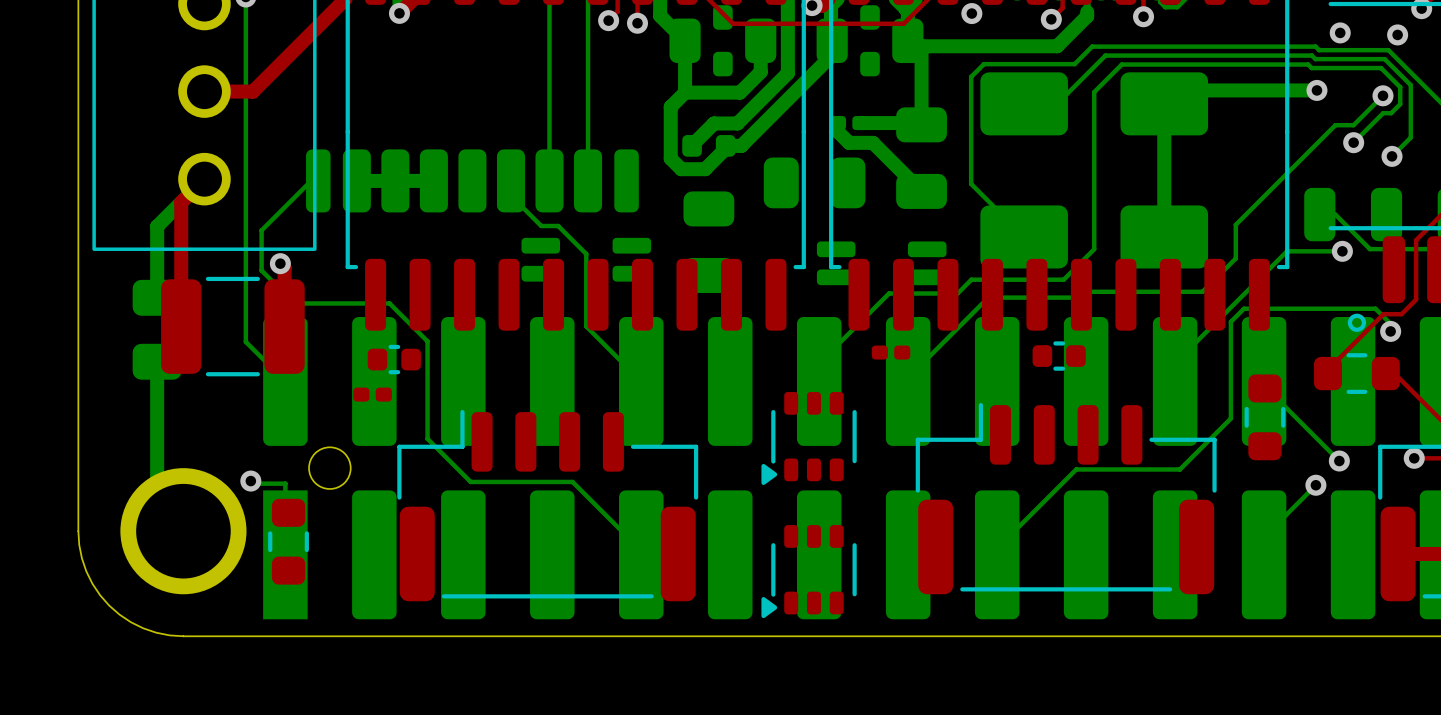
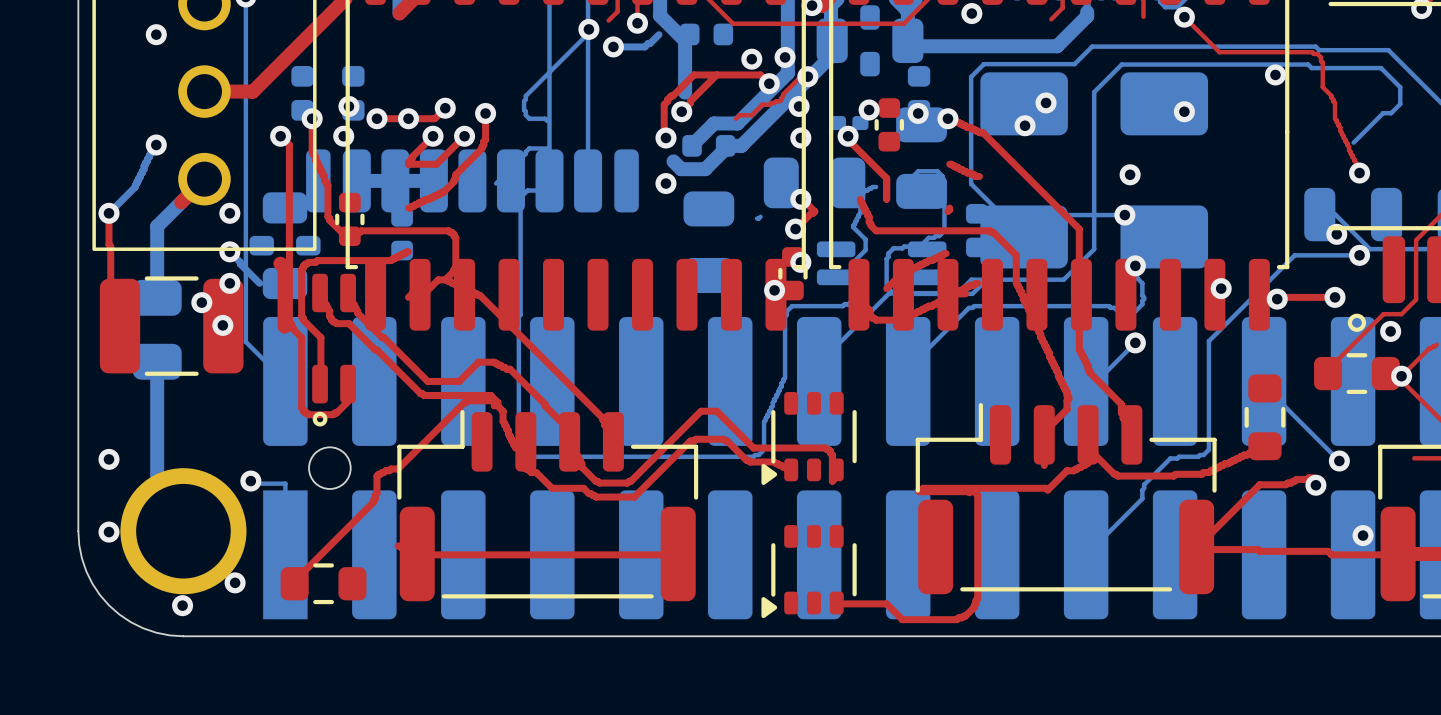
part footprint: [669, 5, 777, 77] -> [679, 23, 734, 46]
via: (399, 13) -> none
via position: (1143, 16) -> (1184, 17)
top track: none -> (1184, 17) (1219, 52) (1312, 52) (1317, 53) (1322, 62) (1322, 87) (1331, 95) (1335, 102) (1335, 118) (1359, 173)
via: (1051, 19) -> none
via position: (608, 20) -> (588, 29)
bottom track: none -> (588, 29) (588, 32) (525, 95) (524, 101) (525, 115) (529, 118) (548, 120)
via: (1340, 32) -> none
via: none -> (156, 34)
bottom track: none -> (658, 34) (644, 46) (613, 46)
via: (1397, 34) -> none
bottom track: (760, 40) (760, 72) (740, 92) (685, 92) (670, 106) (670, 158) (673, 161) -> none
via: none -> (613, 46)
bottom track: (921, 46) (921, 124) (919, 123) (860, 123) -> none
via: none -> (785, 57)
via: none -> (751, 59)
top track: none -> (716, 74) (681, 111)
via: none -> (1275, 74)
top track: none -> (807, 76) (800, 76) (783, 94) (779, 101) (762, 104) (751, 115) (739, 115) (736, 118)
via: none -> (807, 76)
top track: none -> (769, 83) (760, 74) (693, 74) (664, 104) (664, 136) (665, 138)
via: none -> (769, 83)
bottom track: (1177, 90) (1316, 90) -> none
via: (1316, 90) -> none
part: none -> (302, 93)
part: none -> (353, 93)
part: none -> (919, 93)
bottom track: (1382, 95) (1353, 125) (1335, 125) (1235, 224) (1235, 258) (1202, 291) (1087, 291) (1081, 297) (988, 297) (911, 374) -> (1135, 265) (1137, 278) (1142, 283) (1142, 295) (1144, 297) (1142, 304) (1135, 311) (1121, 314) (1114, 307) (1109, 306) (974, 306) (968, 307) (916, 360) (911, 374)
via: (1382, 95) -> none
via: none -> (1046, 102)
bottom track: (1024, 103) (1057, 103) (1105, 55) (1311, 55) (1315, 59) (1384, 59) (1410, 85) (1410, 137) (1392, 156) -> none
bottom track: (1164, 103) (1164, 236) -> none
via: none -> (348, 106)
via: none -> (799, 106)
top track: none -> (445, 108) (434, 118) (376, 118)
via: none -> (445, 108)
via: none -> (869, 109)
via: none -> (681, 111)
via: none -> (1184, 111)
top track: none -> (485, 113) (485, 139) (482, 148) (455, 174) (454, 181) (443, 192) (408, 208)
via: none -> (485, 113)
via: none -> (918, 113)
top track: none -> (312, 118) (312, 152) (327, 185) (327, 216) (329, 220) (341, 232) (348, 236) (361, 230) (448, 230) (452, 232) (455, 237) (455, 267) (445, 279)
via: none -> (312, 118)
via: none -> (376, 118)
via: none -> (408, 118)
top track: none -> (947, 118) (982, 132) (1079, 229) (1079, 349) (1089, 372) (1121, 404) (1123, 418) (1131, 435)
via: none -> (947, 118)
bottom track: (837, 123) (837, 131) (849, 142) (872, 142) (921, 191) -> none
part: none -> (889, 124)
via: none -> (1025, 125)
top track: none -> (280, 136) (289, 145) (289, 321) (292, 328) (301, 337) (301, 407) (303, 411) (308, 414) (333, 414) (336, 412) (347, 402) (347, 383)
via: none -> (280, 136)
via: none -> (343, 136)
top track: none -> (433, 136) (412, 157) (408, 164) (436, 164) (464, 136)
via: none -> (433, 136)
via: none -> (464, 136)
top track: none -> (848, 136) (851, 139) (851, 143) (886, 178) (886, 199)
via: none -> (848, 136)
via: none -> (665, 138)
via: none -> (800, 138)
via: (1353, 142) -> none
bottom track: none -> (156, 145) (145, 162) (135, 187) (109, 213)
via: none -> (156, 145)
bottom track: none -> (548, 148) (529, 148) (496, 183)
via: (1392, 156) -> none
top track: none -> (949, 164) (979, 176)
via: none -> (1359, 173)
via: none -> (1130, 174)
bottom track: none -> (911, 178) (918, 171) (937, 171) (942, 176) (944, 181) (944, 230) (939, 236) (928, 237) (921, 244) (893, 248) (888, 253) (886, 286) (897, 293) (972, 293) (1051, 215) (1124, 215)
bottom track: (318, 180) (311, 180) (261, 230) (261, 270) (294, 303) (389, 303) (427, 341) (427, 438) (470, 481) (572, 481) (641, 550) (641, 554) -> none
bottom track: (510, 180) (510, 195) (541, 225) (558, 225) (586, 254) (586, 326) (641, 381) -> none
via: none -> (665, 183)
bottom track: none -> (876, 187) (869, 188) (862, 194) (860, 213) (853, 225) (865, 239) (865, 250) (853, 262) (853, 295) (851, 300) (842, 306) (792, 306) (786, 311) (785, 316) (785, 377) (764, 421) (762, 451) (753, 456) (529, 456) (520, 451) (518, 446) (520, 197) (527, 190) (548, 190)
top track: none -> (800, 199) (814, 211) (795, 229)
via: none -> (800, 199)
top track: none -> (860, 199) (869, 216) (869, 222) (876, 230) (989, 230) (1016, 255) (1016, 283) (1068, 397) (1067, 409) (1047, 430)
top track: (181, 202) (181, 326) -> none
top track: none -> (949, 208) (947, 211)
top track: none -> (109, 213) (110, 307) (119, 325)
via: none -> (109, 213)
via: none -> (229, 213)
via: none -> (1124, 215)
bottom track: none -> (760, 216) (757, 218)
via: none -> (795, 229)
part: none -> (976, 230)
part: none -> (402, 233)
via: none -> (1336, 234)
part: none -> (285, 245)
bottom track: none -> (229, 251) (259, 283)
via: none -> (229, 251)
top track: none -> (408, 251) (390, 260) (317, 260) (303, 265) (301, 269) (301, 316) (320, 337) (320, 383)
bottom track: (1342, 251) (1286, 251) (1175, 363) -> none
via: (1342, 251) -> none
top track: none -> (946, 253) (902, 272) (886, 288)
bottom track: none -> (1359, 255) (1294, 255) (1208, 341) (1208, 449) (1198, 456) (1170, 458) (1144, 484) (1142, 498) (1086, 554)
via: none -> (1359, 255)
part side: bottom (586, 259) -> top (334, 350)
via: none -> (800, 262)
via: (280, 263) -> none
via: none -> (1135, 265)
part: none -> (792, 273)
via: none -> (229, 283)
top track: none -> (977, 283) (954, 293)
top track: none -> (860, 288) (863, 292) (863, 304) (869, 309) (870, 316) (876, 320) (900, 320) (932, 306) (953, 293) (965, 293)
via: none -> (1221, 288)
via: none -> (774, 290)
top track: none -> (320, 293) (333, 321) (348, 323) (420, 393) (424, 395) (490, 395) (503, 411) (503, 421) (515, 448)
top track: none -> (408, 297) (412, 293) (424, 293) (438, 279) (447, 279) (480, 295) (602, 418) (613, 442)
top track: none -> (1335, 297) (1275, 297) (1277, 299)
via: none -> (1335, 297)
top track: none -> (350, 299) (357, 313) (427, 381) (459, 381) (478, 362) (494, 362) (510, 369) (566, 426) (566, 439) (573, 446) (573, 458)
via: none -> (1277, 299)
via: none -> (201, 302)
via: none -> (222, 325)
part position: (232, 326) -> (171, 326)
bottom track: (1390, 331) (1390, 323) (1375, 308) (1243, 308) (1230, 321) (1230, 418) (1179, 469) (1076, 469) (997, 548) -> none
bottom track: none -> (1135, 342) (1105, 372) (1086, 381)
via: none -> (1135, 342)
top track: none -> (1436, 344) (1429, 348) (1401, 376)
part: (891, 352) -> none
part: (1059, 356) -> none
part rotation: 0° (394, 359) -> 90° clockwise (349, 219)
part position: (394, 359) -> (349, 219)
via: none -> (1401, 376)
part: (372, 394) -> none
top track: none -> (494, 405) (492, 400) (468, 400) (464, 402) (398, 469) (390, 469) (378, 474) (376, 476) (376, 493) (373, 502) (296, 579) (294, 584)
top track: none -> (1088, 435) (1091, 439) (1091, 451) (1117, 476) (1201, 474) (1264, 446)
top track: none -> (573, 448) (581, 467) (595, 481) (599, 483) (627, 483) (701, 411) (716, 411) (753, 448) (825, 448) (832, 455) (832, 481) (837, 470)
via: (1414, 458) -> none
via: none -> (109, 459)
top track: none -> (522, 463) (531, 472) (536, 472) (552, 488) (583, 488) (595, 497) (634, 497) (690, 441) (695, 439) (723, 439) (750, 462) (774, 462) (792, 470)
top track: none -> (1044, 463) (1044, 465)
top track: none -> (1088, 463) (1074, 470) (1067, 470) (1047, 490) (1046, 488) (923, 488) (919, 490)
top track: none -> (1314, 477) (1296, 479) (1285, 484) (1259, 484) (1196, 547) (1200, 549) (1257, 549) (1259, 551) (1328, 551) (1331, 554) (1398, 554)
bottom track: (1315, 485) (1264, 537) -> none
top track: none -> (919, 490) (969, 491)
top track: none -> (974, 491) (977, 495) (977, 598) (974, 607) (965, 616) (956, 619) (902, 619) (886, 603) (837, 603)
via: none -> (109, 532)
via: none -> (1363, 535)
top track: none -> (681, 539) (681, 551) (678, 554) (415, 554) (398, 546)
part rotation: 0° (288, 541) -> 90° clockwise (323, 583)
part position: (288, 541) -> (323, 583)
via: none -> (235, 582)
via: none -> (182, 605)

